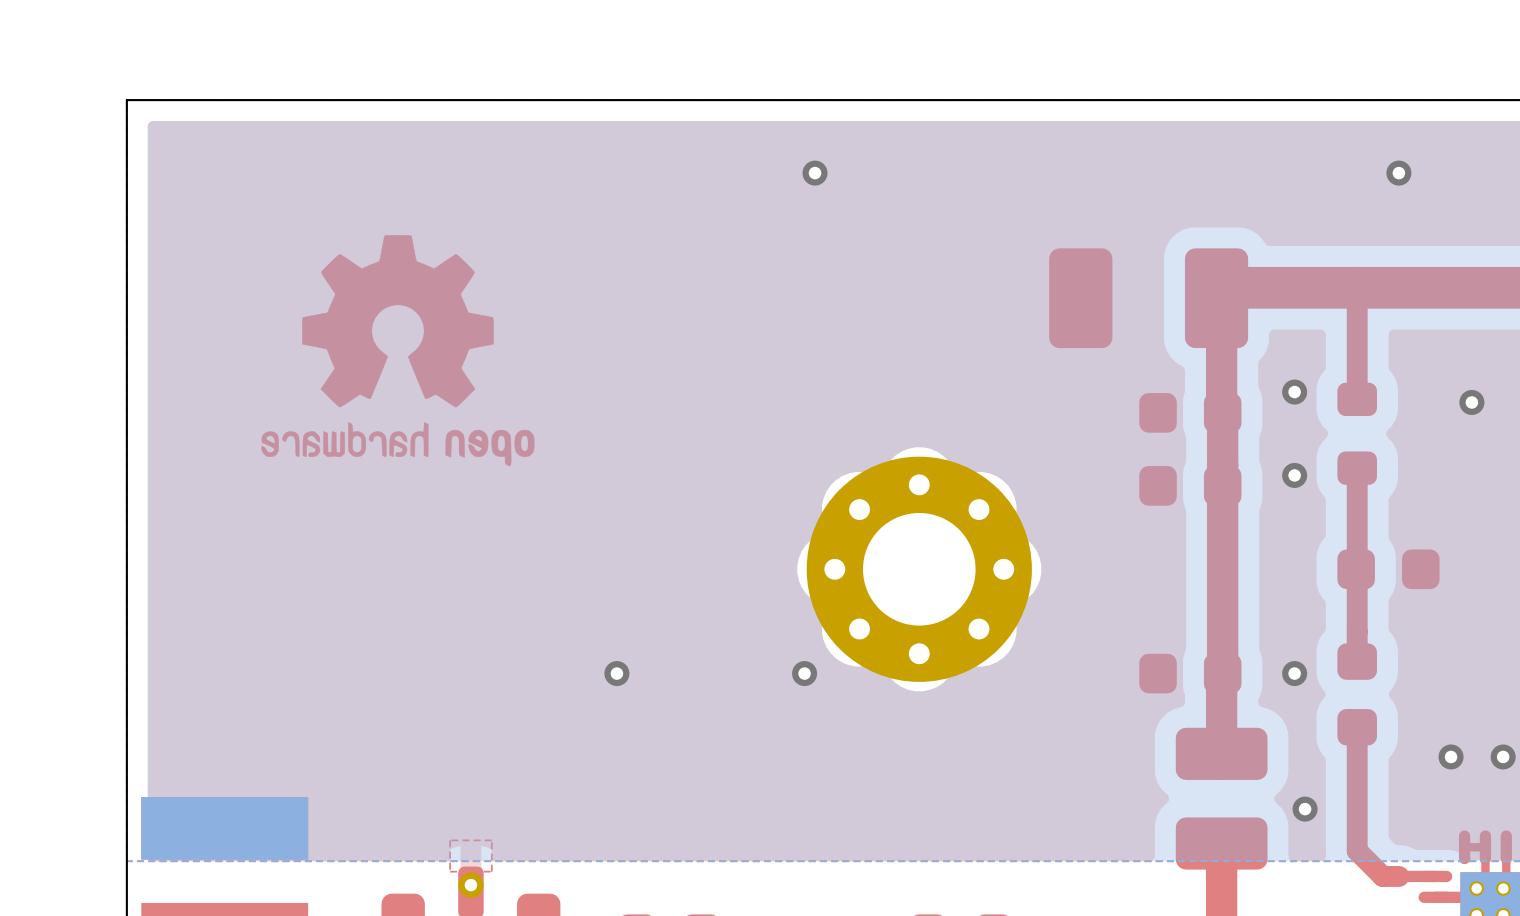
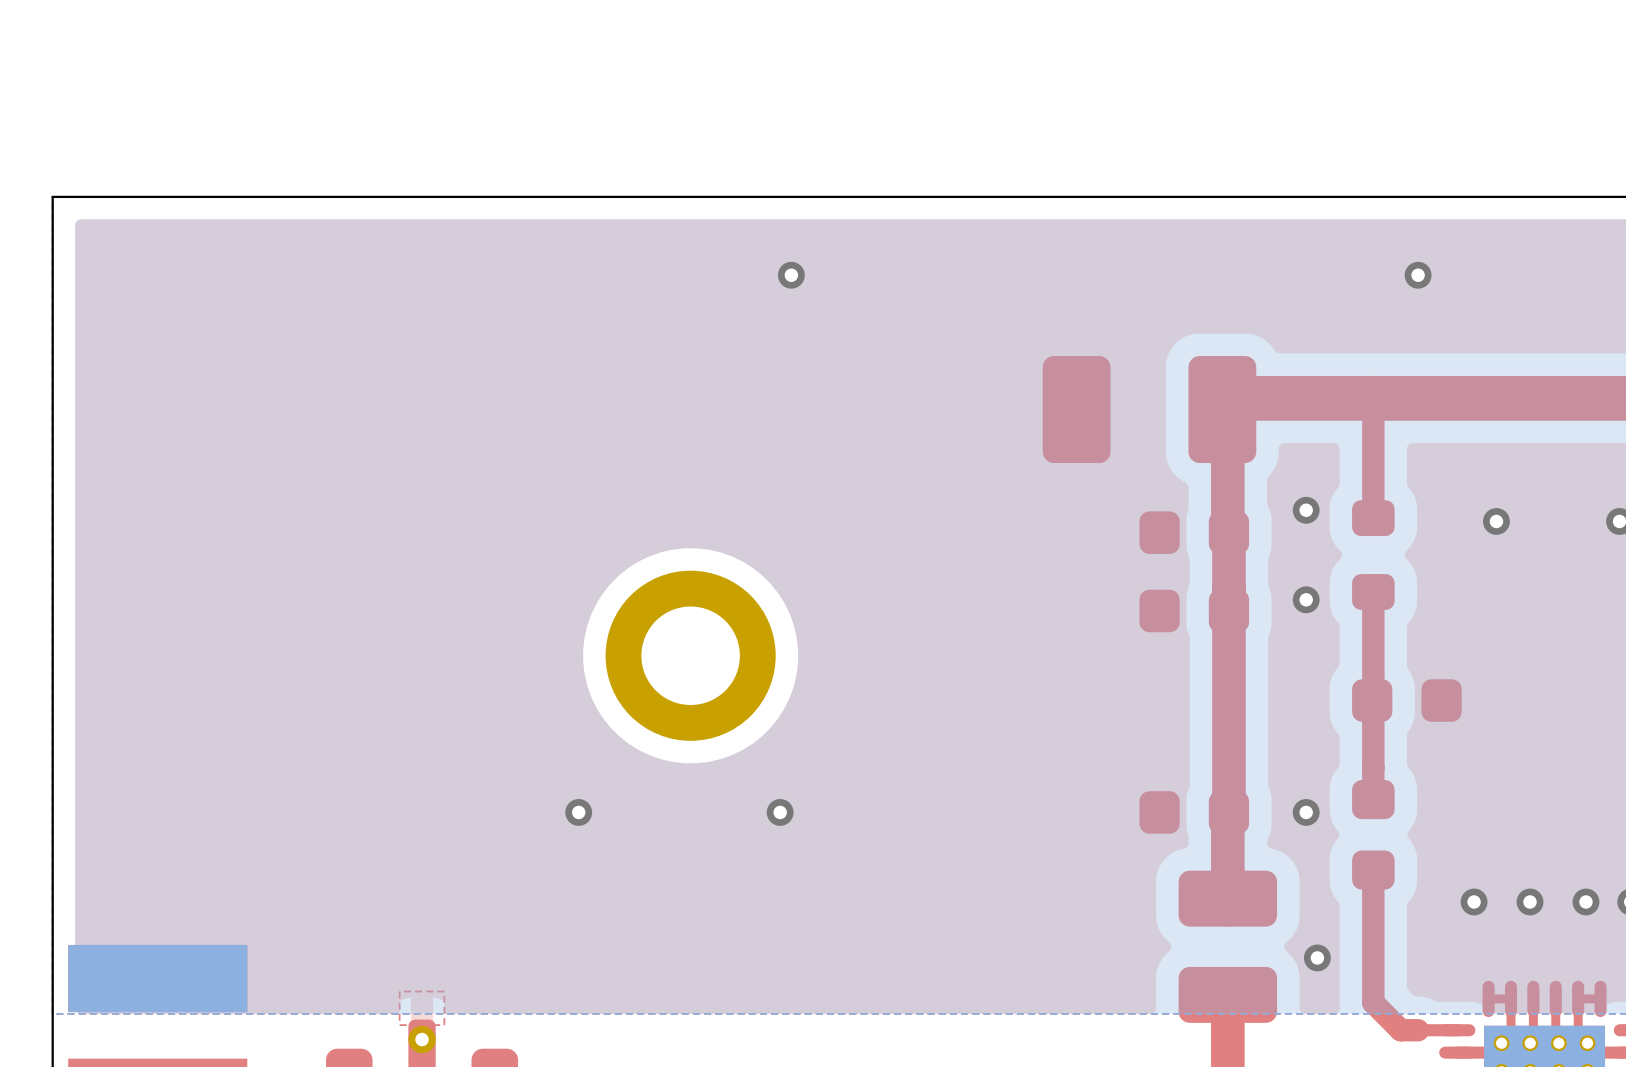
drawing: [261, 235, 535, 467] -> none
part: none -> (690, 655)
part: (919, 569) -> none

